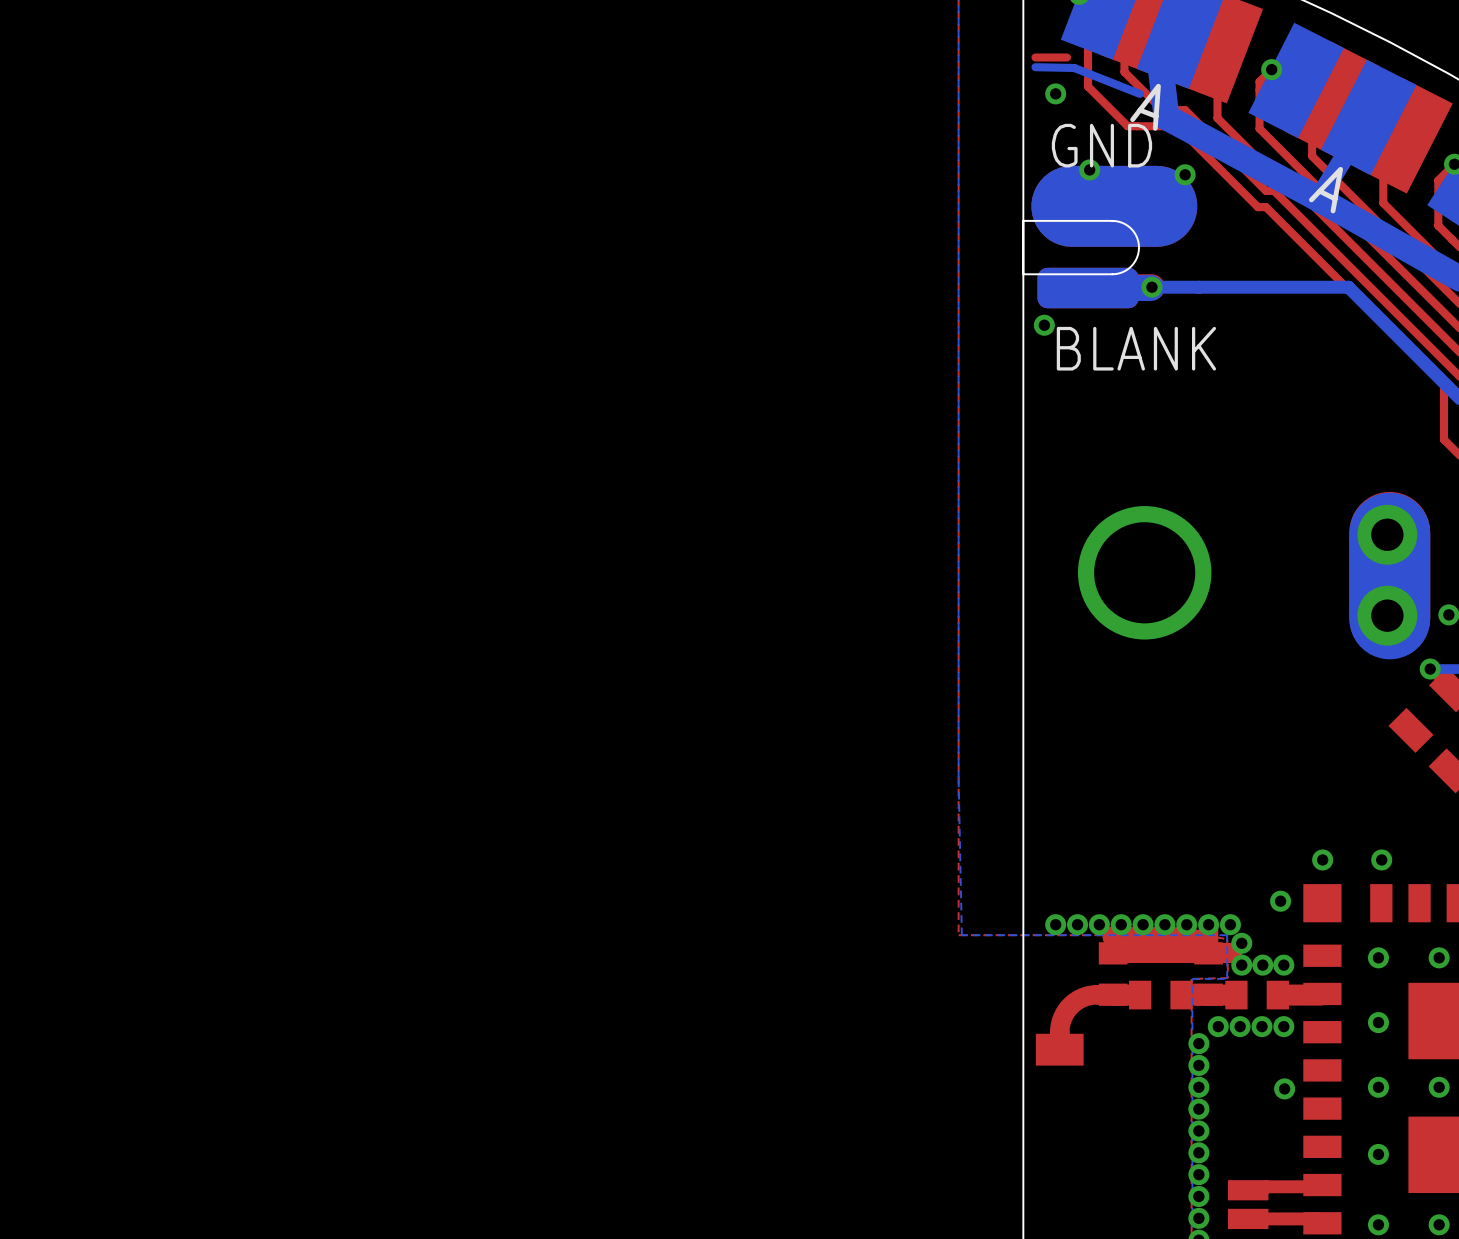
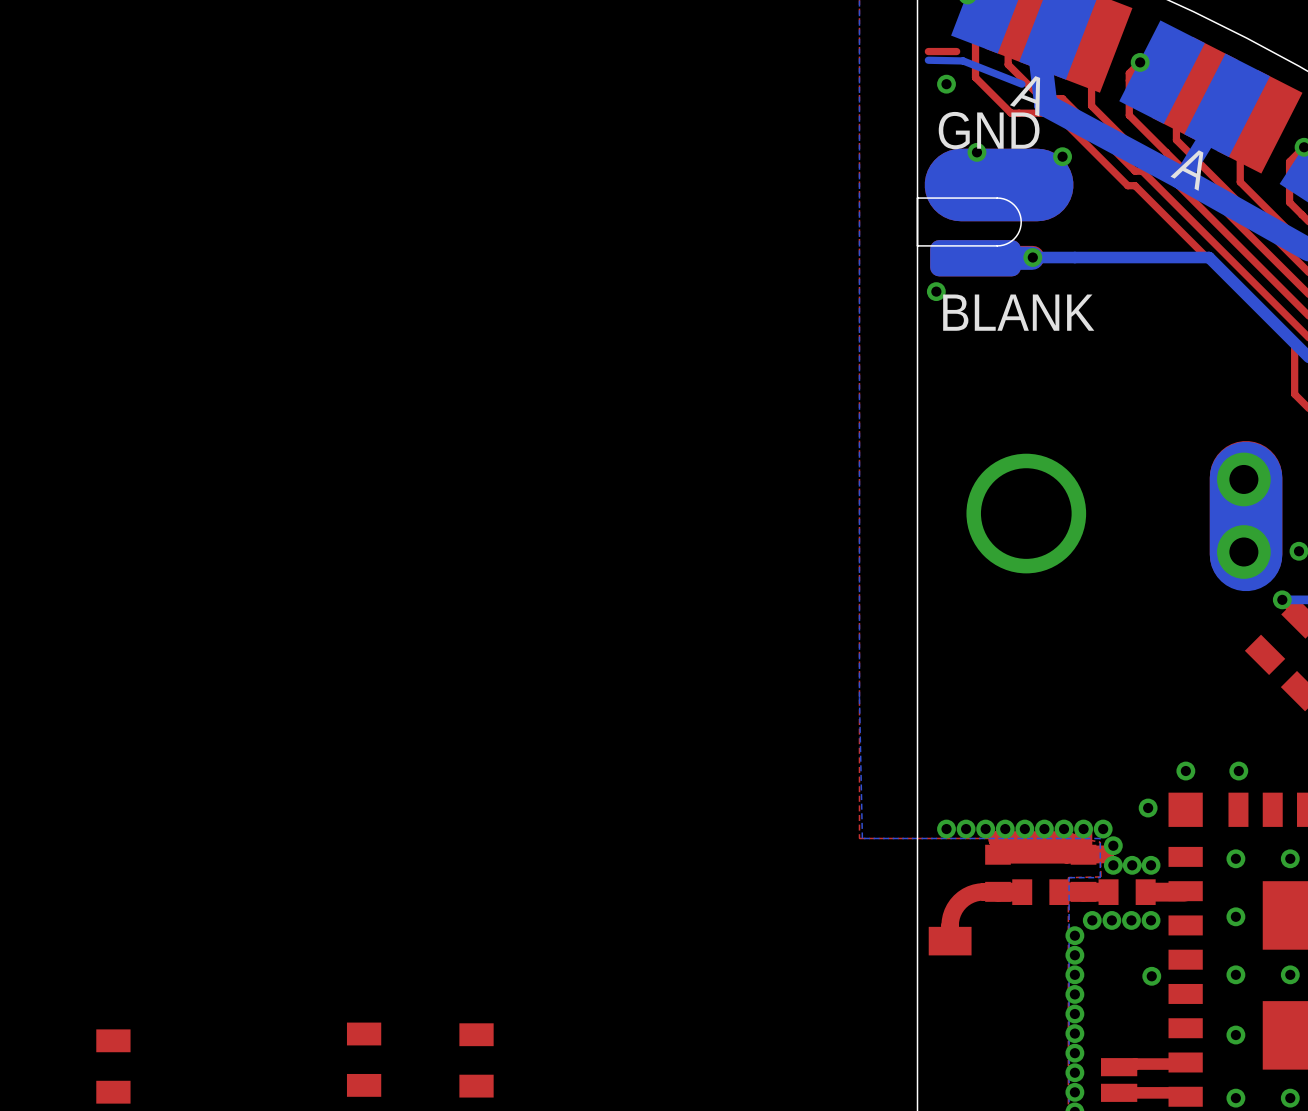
part: none -> (364, 1059)
part: none -> (476, 1060)
part: none -> (113, 1066)

